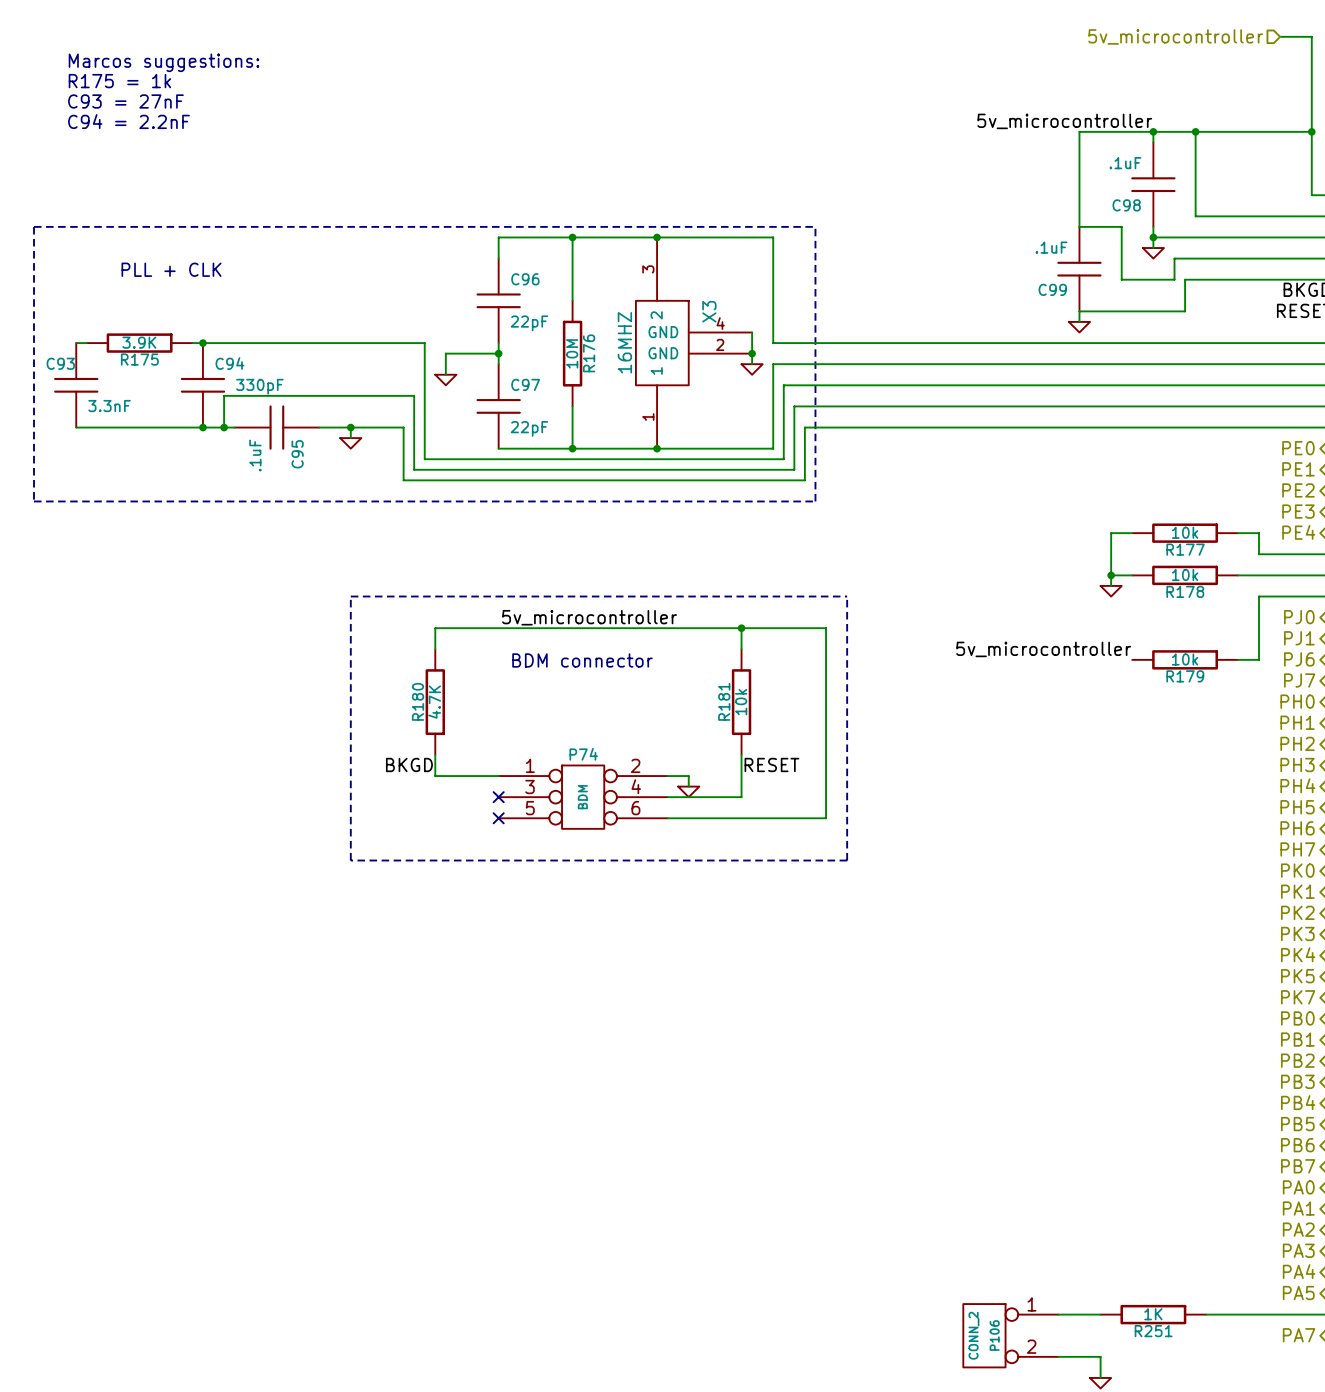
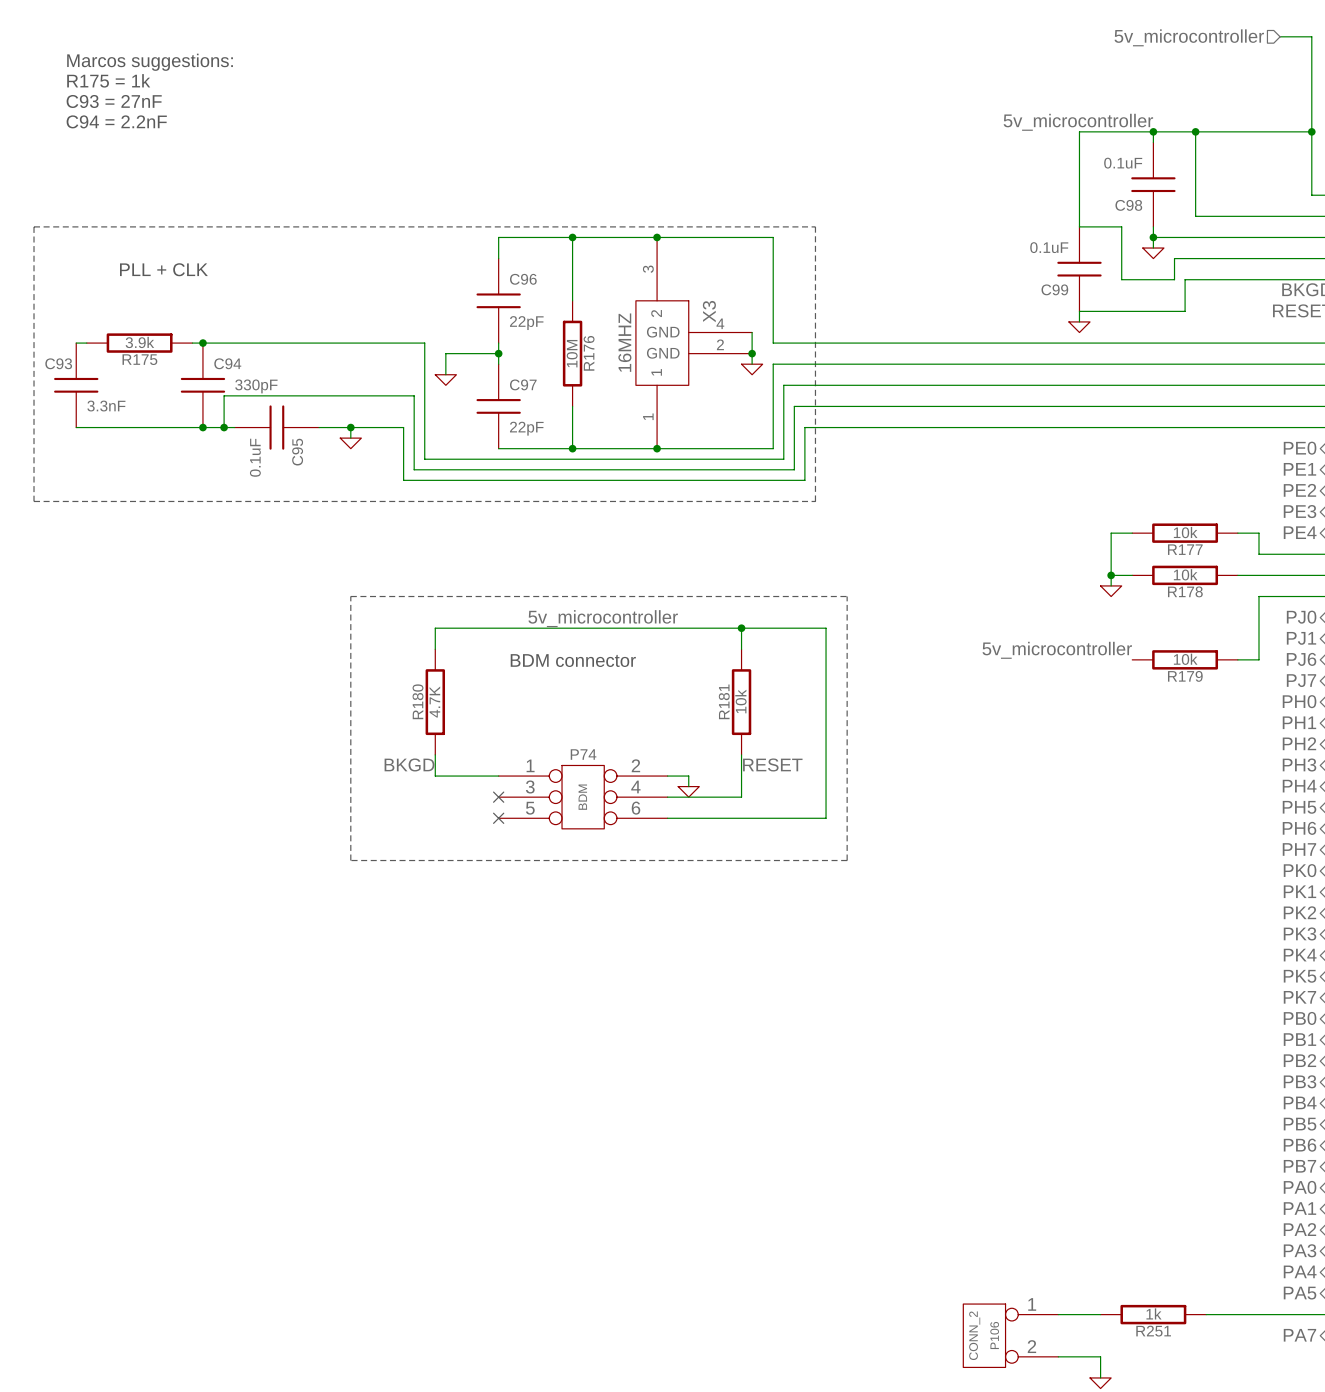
C98 value: .1uF (1125, 163) -> 0.1uF (1123, 163)
C99 value: .1uF (1051, 247) -> 0.1uF (1049, 247)
R175 value: 3.9K (139, 342) -> 3.9k (139, 342)
C95 value: .1uF (255, 455) -> 0.1uF (255, 457)
R251 value: 1K (1153, 1314) -> 1k (1153, 1313)

